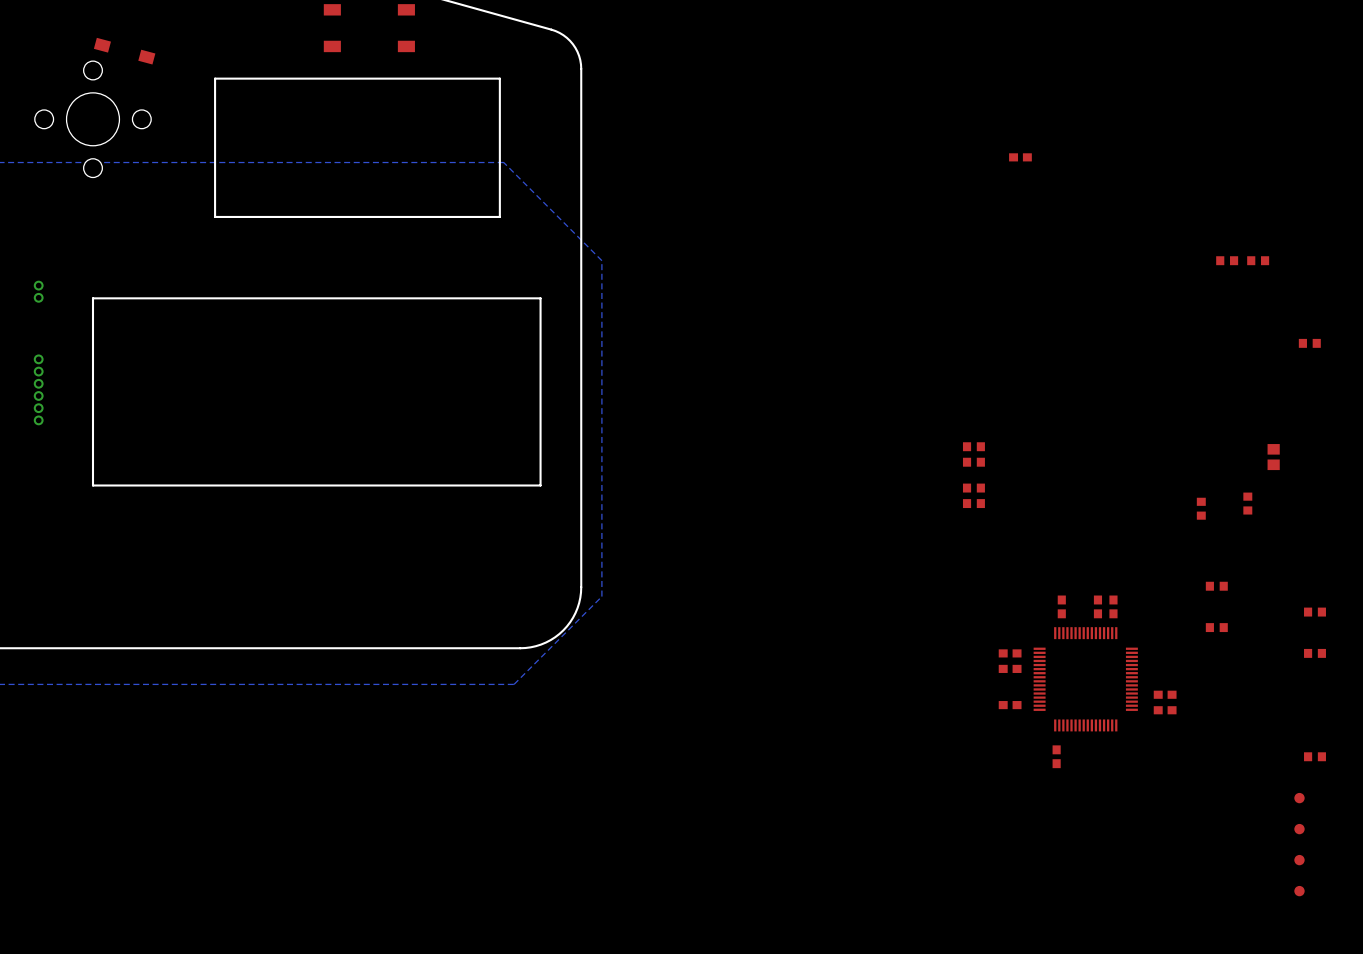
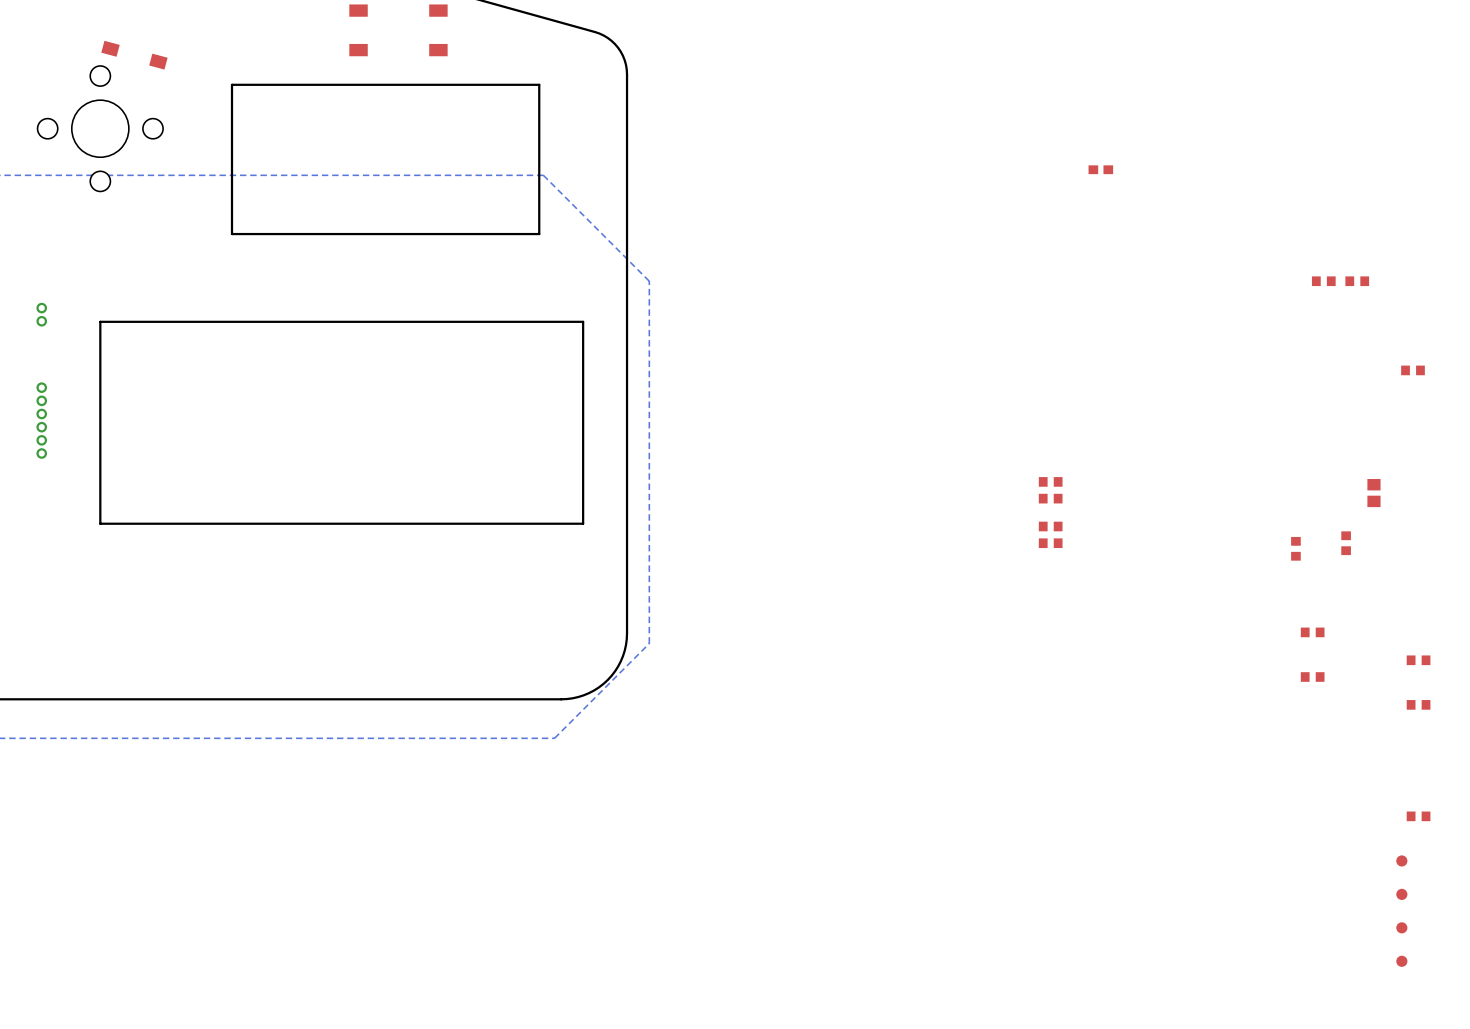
part: (1061, 606) -> none
part: (1097, 606) -> none
part: (1113, 606) -> none
part: (1010, 653) -> none
part: (1010, 668) -> none
part: (1085, 679) -> none
part: (1165, 694) -> none
part: (1010, 705) -> none
part: (1165, 710) -> none
part: (1056, 756) -> none

